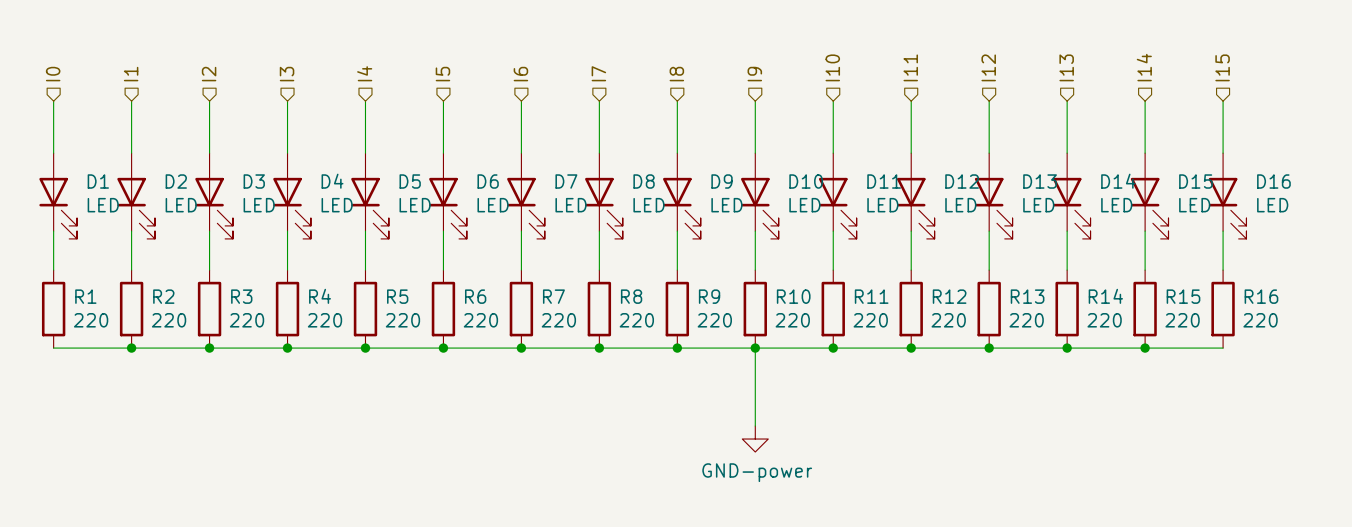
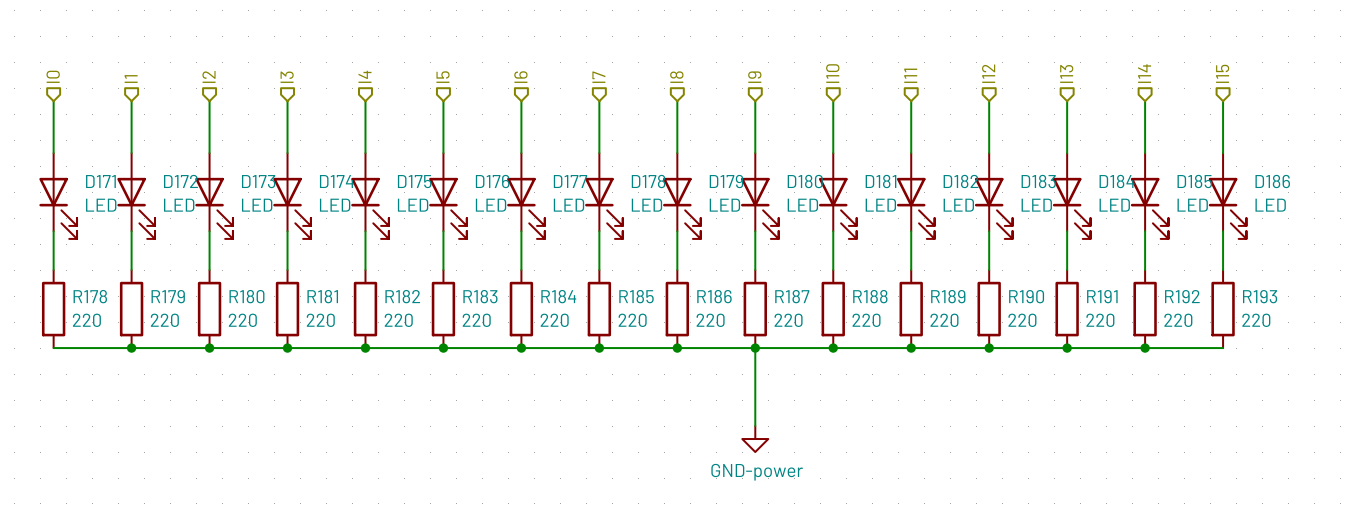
D1 name: D1 (98, 181) -> D171 (100, 181)
D2 name: D2 (176, 181) -> D172 (180, 181)
D3 name: D3 (254, 181) -> D173 (258, 181)
D4 name: D4 (332, 181) -> D174 (336, 181)
D5 name: D5 (410, 181) -> D175 (414, 181)
D6 name: D6 (488, 181) -> D176 (492, 181)
D7 name: D7 (566, 181) -> D177 (570, 181)
D8 name: D8 (644, 181) -> D178 (648, 181)
D9 name: D9 (722, 181) -> D179 (726, 181)
D10 name: D10 (806, 181) -> D180 (805, 181)
D11 name: D11 (884, 181) -> D181 (881, 181)
D12 name: D12 (962, 181) -> D182 (961, 181)
D13 name: D13 (1040, 181) -> D183 (1038, 181)
D14 name: D14 (1118, 181) -> D184 (1117, 181)
D15 name: D15 (1195, 181) -> D185 (1194, 181)
D16 name: D16 (1273, 181) -> D186 (1272, 181)
R1 name: R1 (85, 296) -> R178 (90, 296)
R2 name: R2 (163, 296) -> R179 (168, 296)
R3 name: R3 (241, 296) -> R180 (246, 296)
R4 name: R4 (320, 296) -> R181 (322, 296)
R5 name: R5 (397, 296) -> R182 (402, 296)
R6 name: R6 (475, 296) -> R183 (480, 296)
R7 name: R7 (553, 296) -> R184 (558, 296)
R8 name: R8 (631, 296) -> R185 (636, 296)
R9 name: R9 (709, 296) -> R186 (714, 296)
R10 name: R10 (793, 296) -> R187 (792, 296)
R11 name: R11 (871, 296) -> R188 (870, 296)
R12 name: R12 (949, 296) -> R189 (948, 296)
R13 name: R13 (1027, 296) -> R190 (1026, 296)
R14 name: R14 (1105, 296) -> R191 (1102, 296)
R15 name: R15 (1183, 296) -> R192 (1182, 296)
R16 name: R16 (1261, 296) -> R193 (1260, 296)

